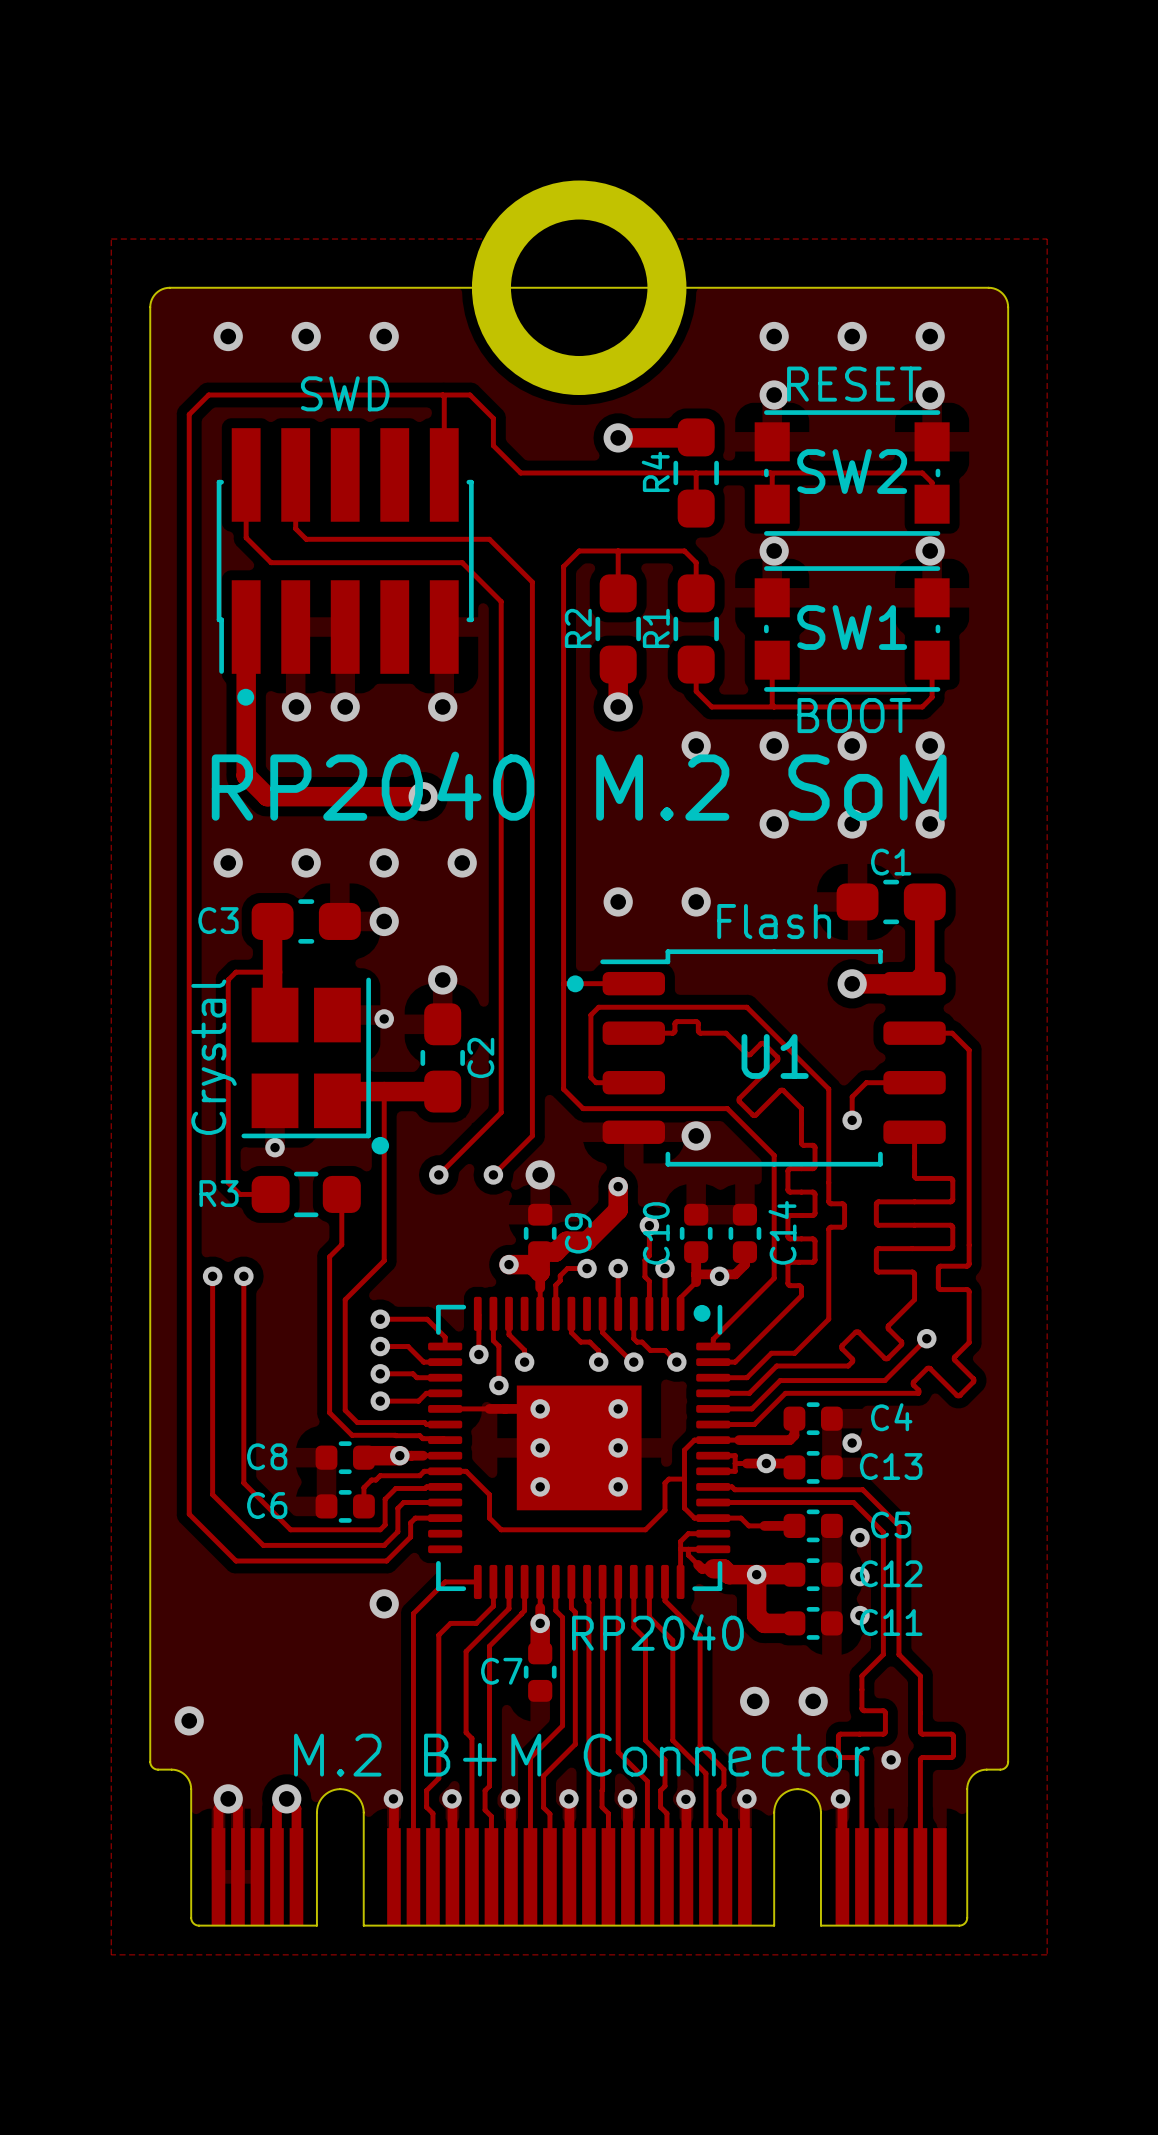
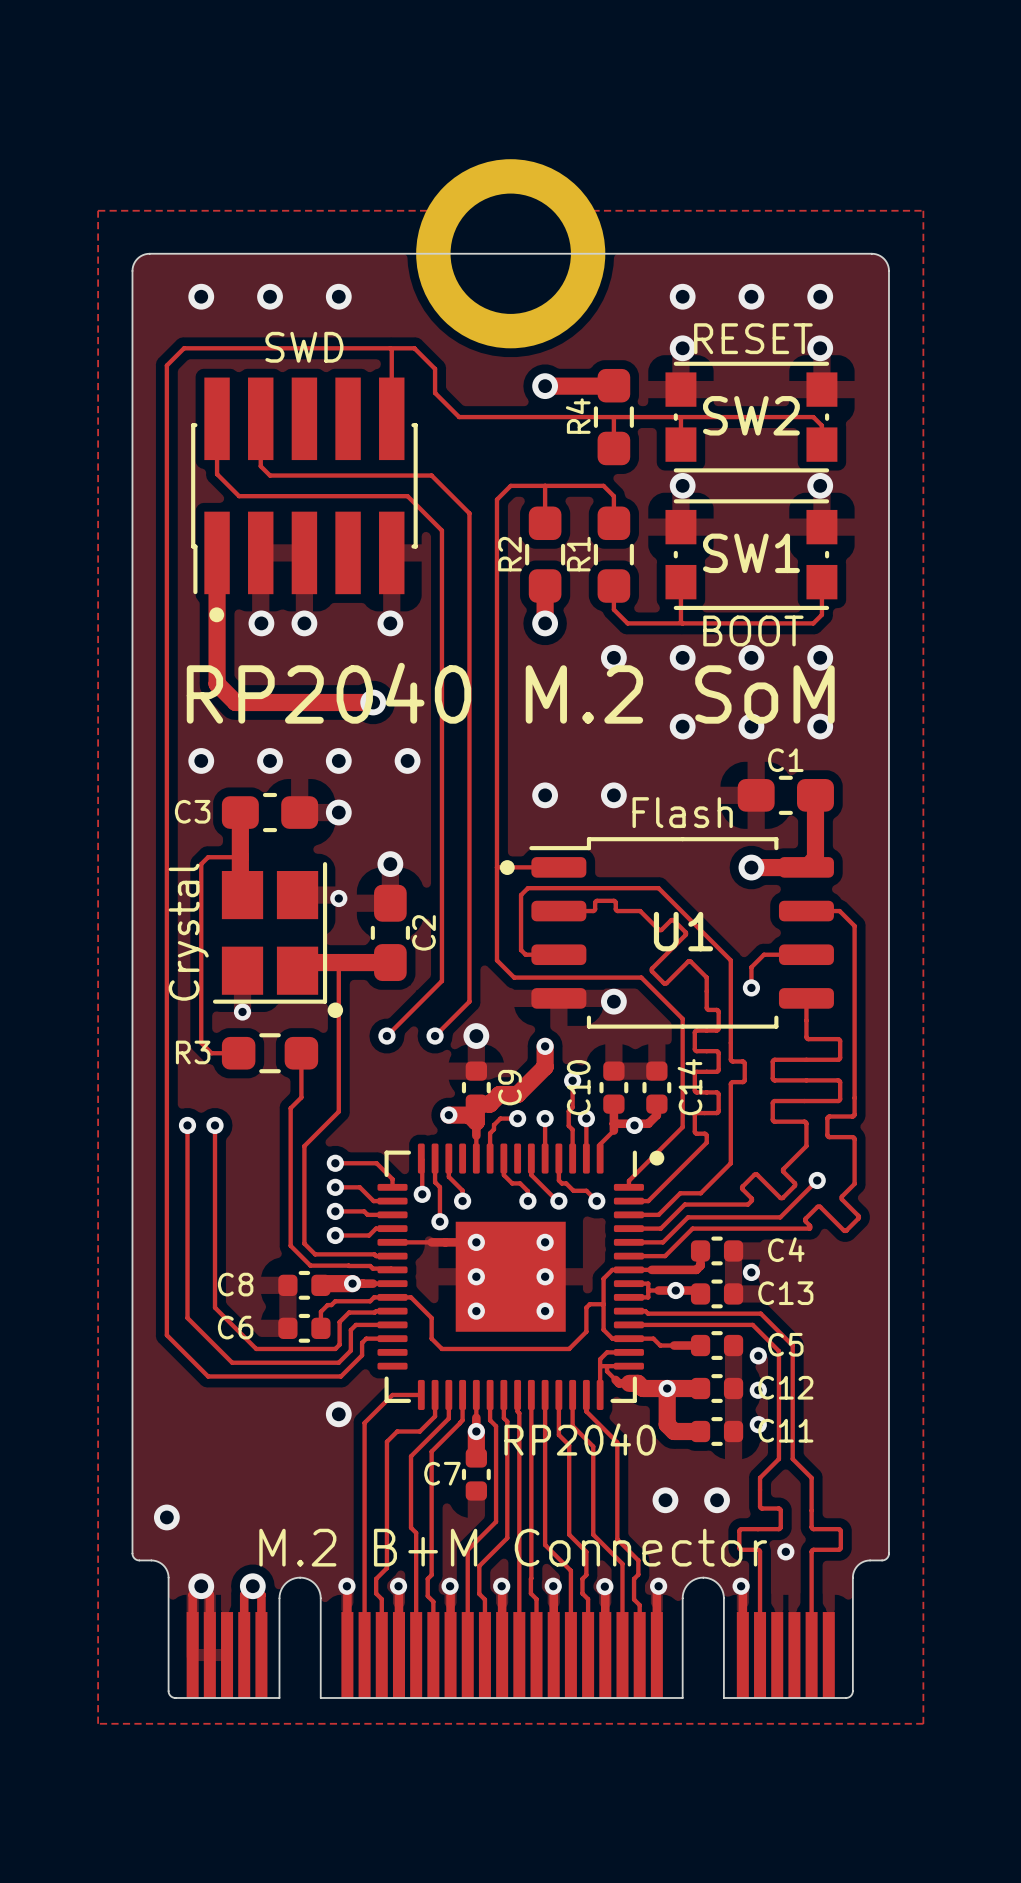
drawing position: (702, 1313) -> (656, 1158)

